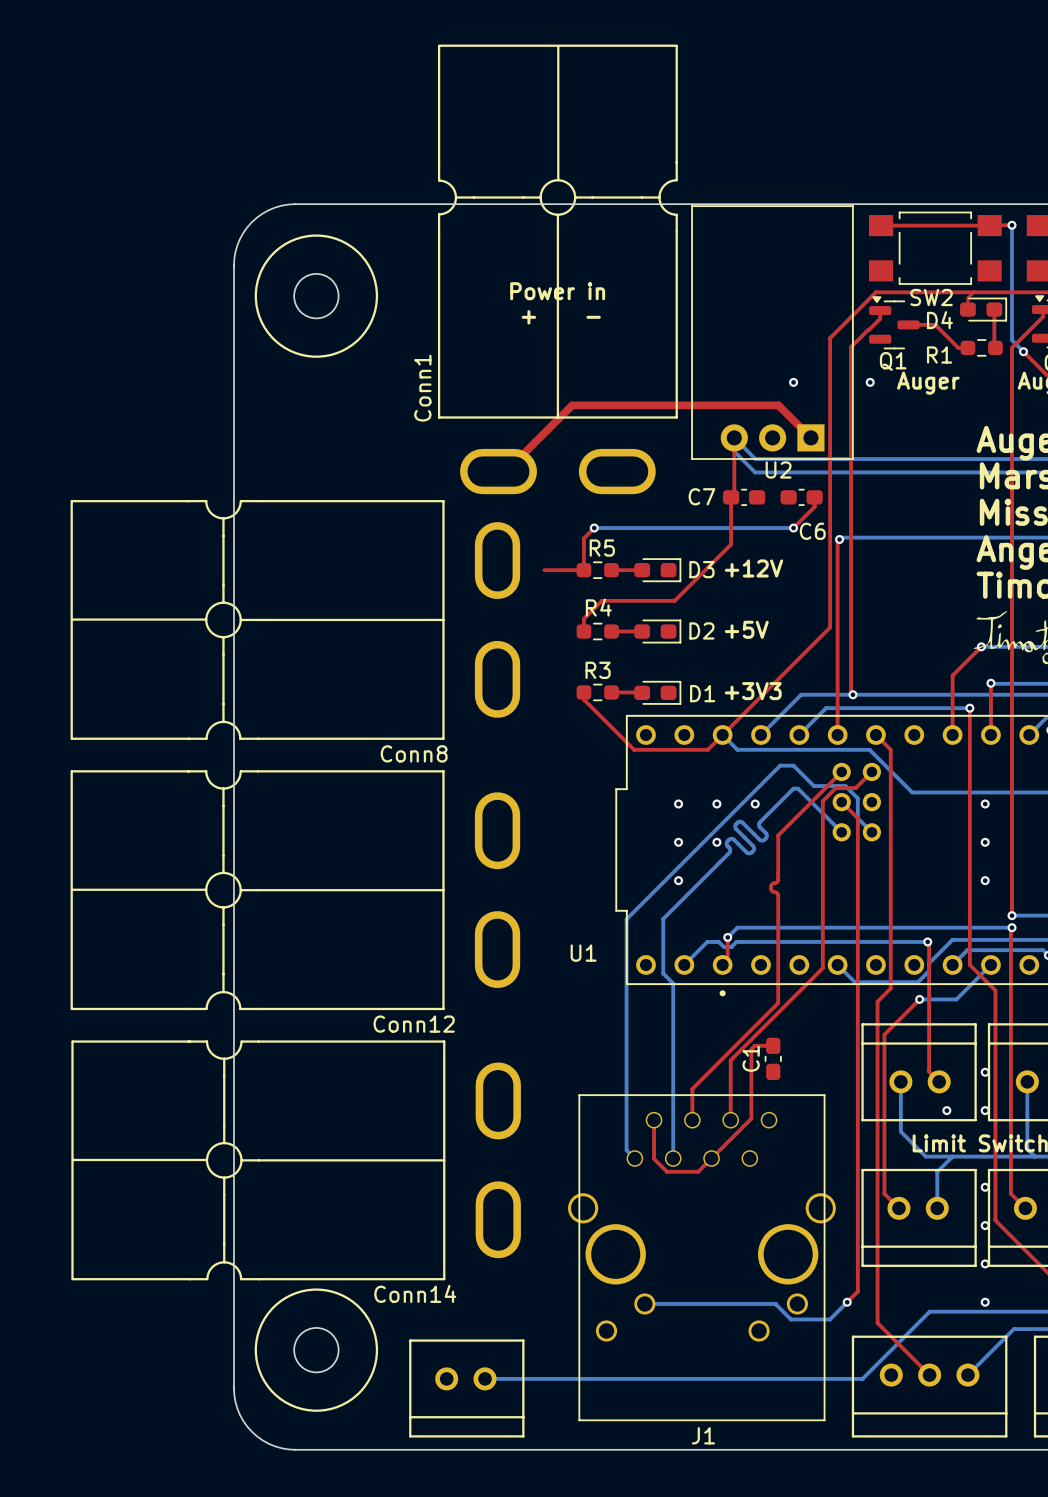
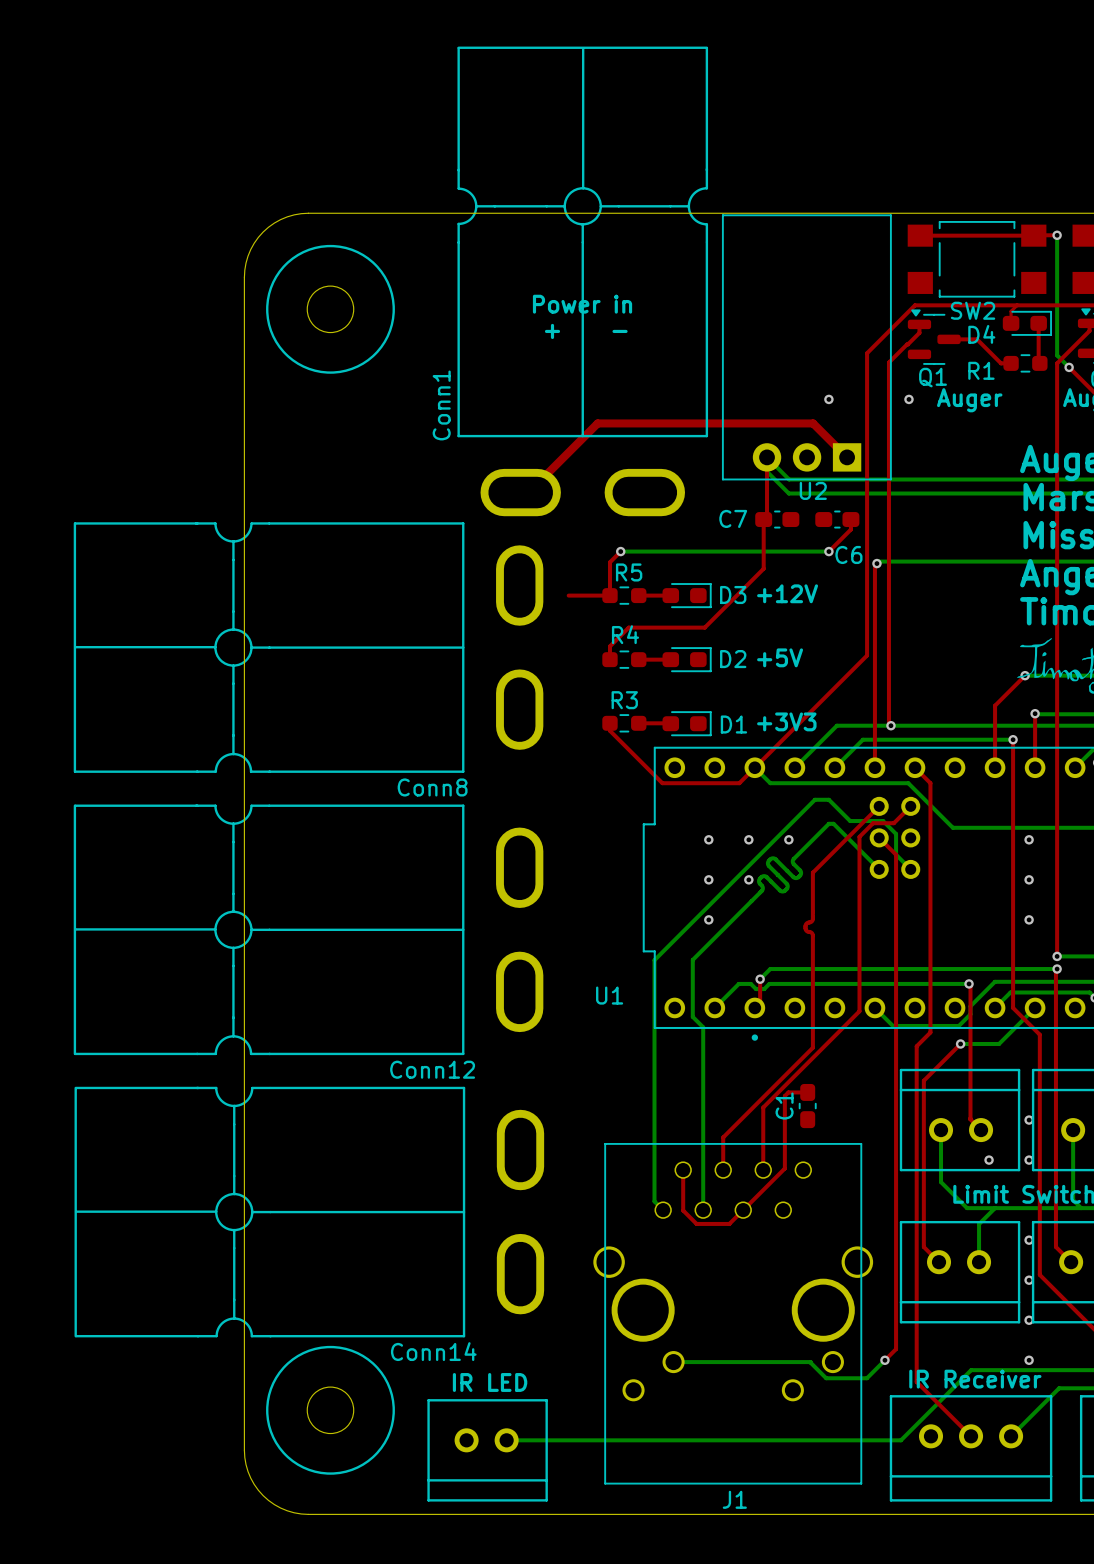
text: none -> IR Receiver (975, 1379)
text: none -> IR LED (490, 1382)

